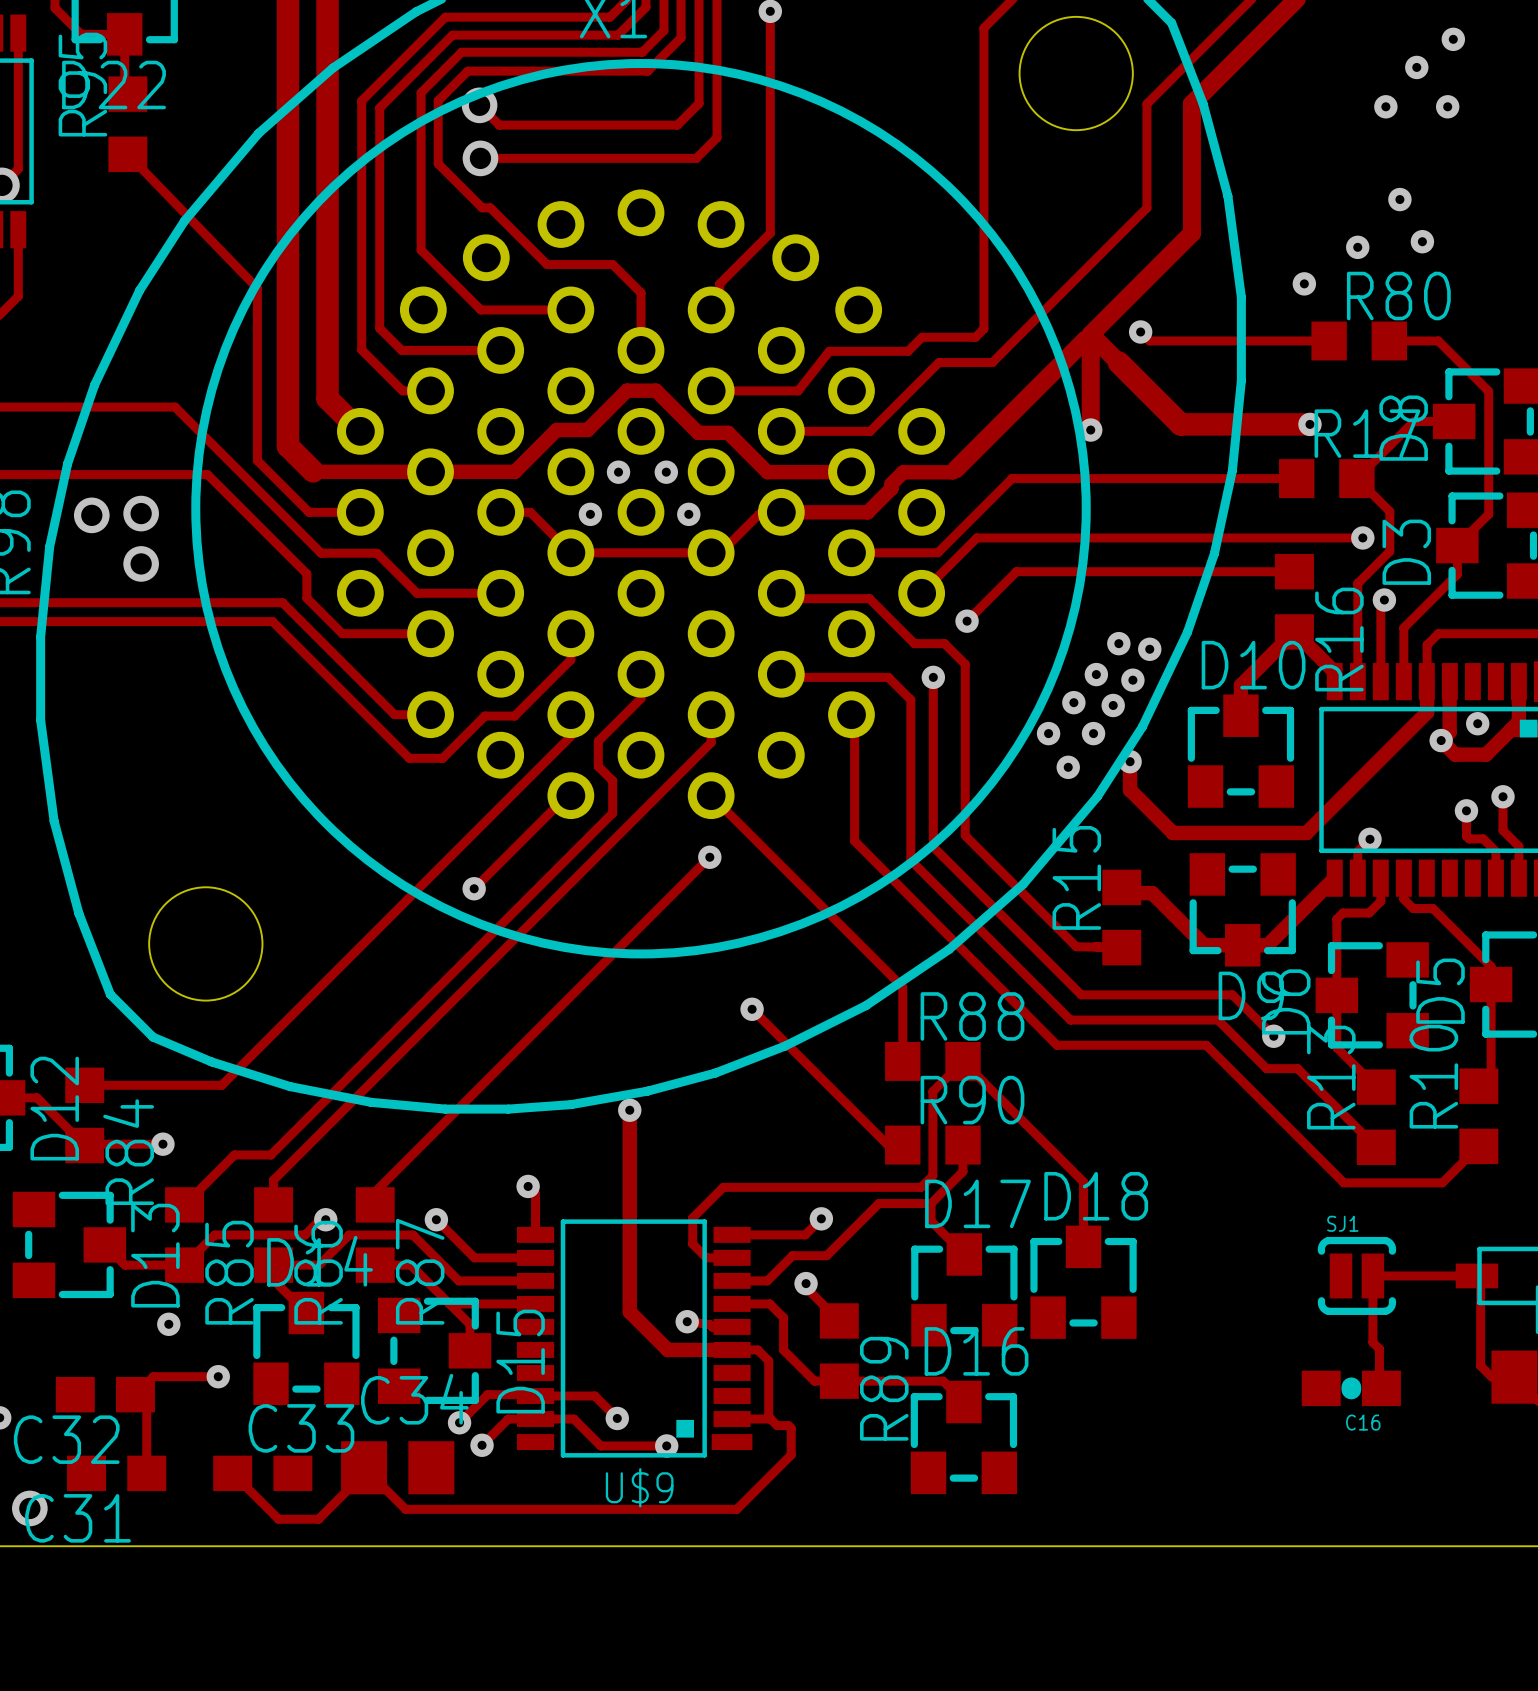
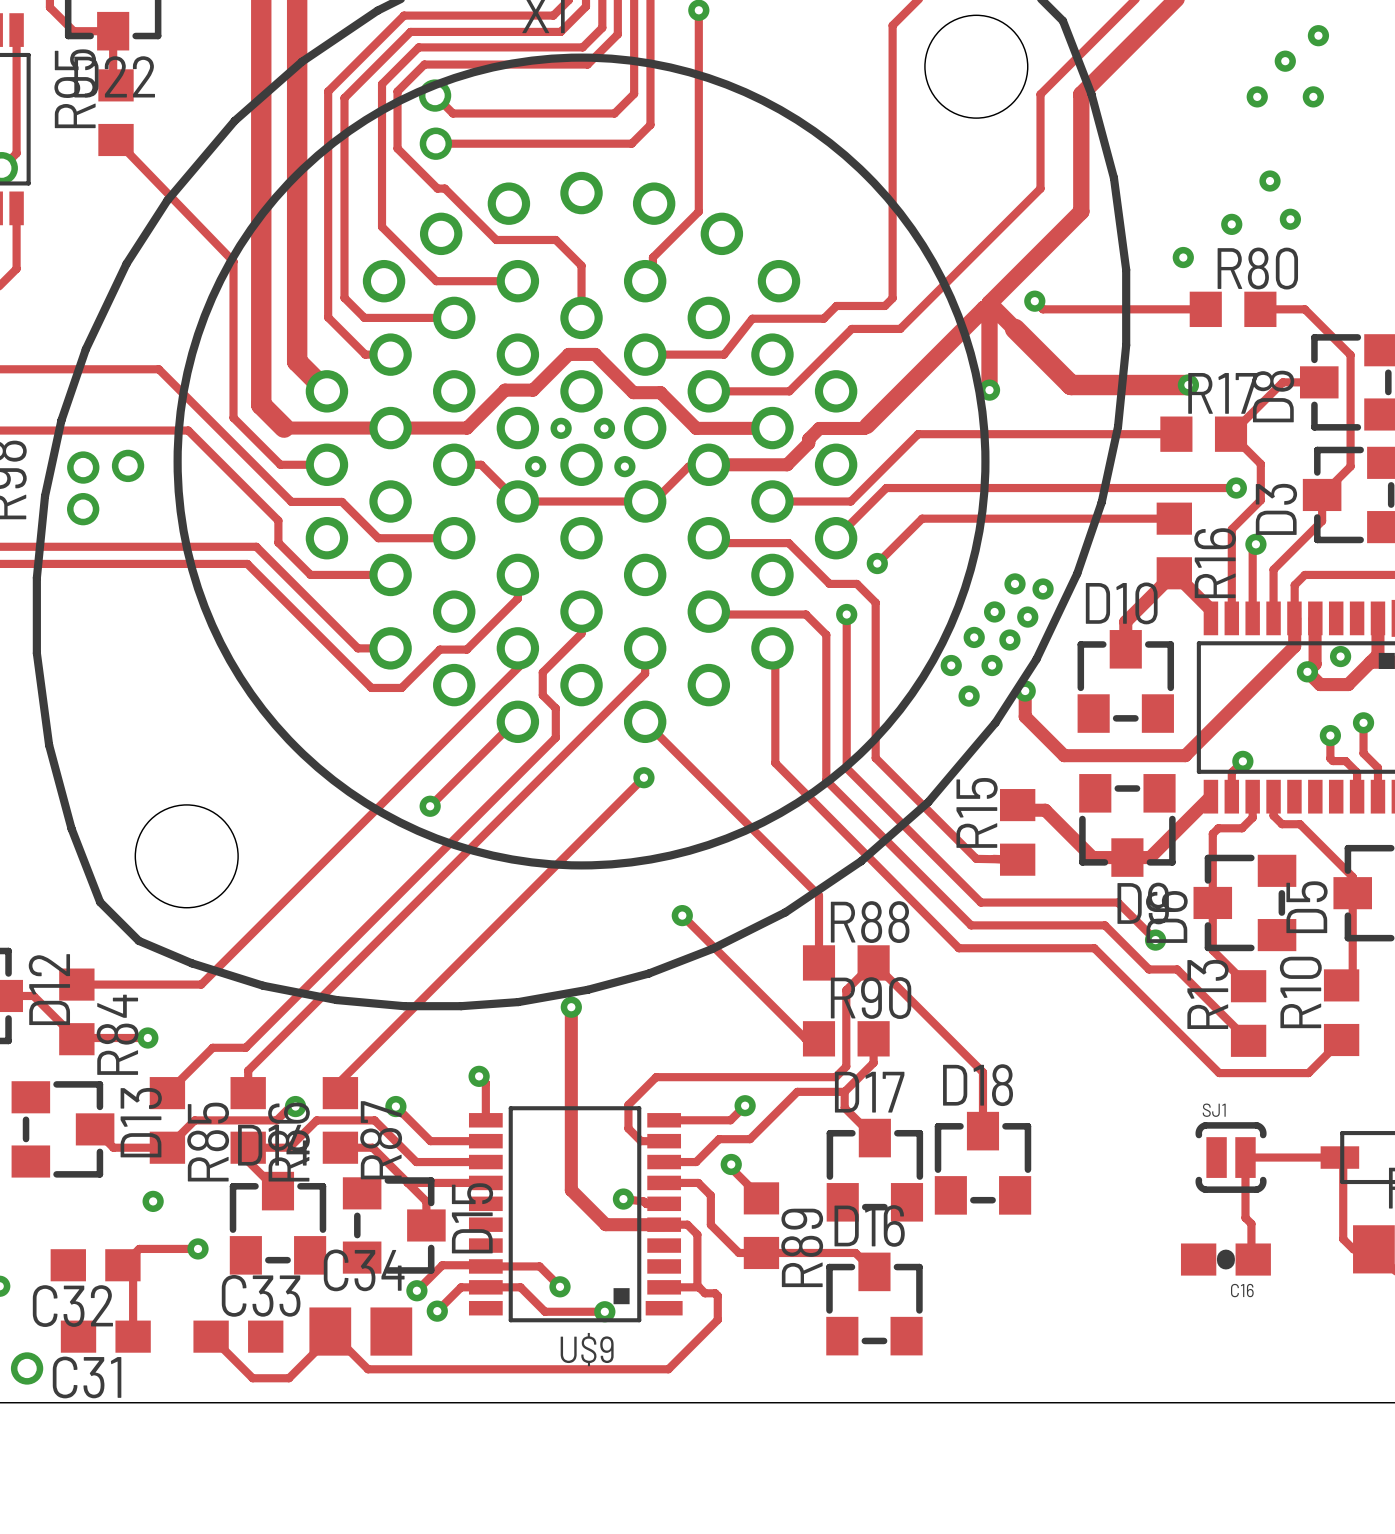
via position: (141, 563) -> (83, 509)

